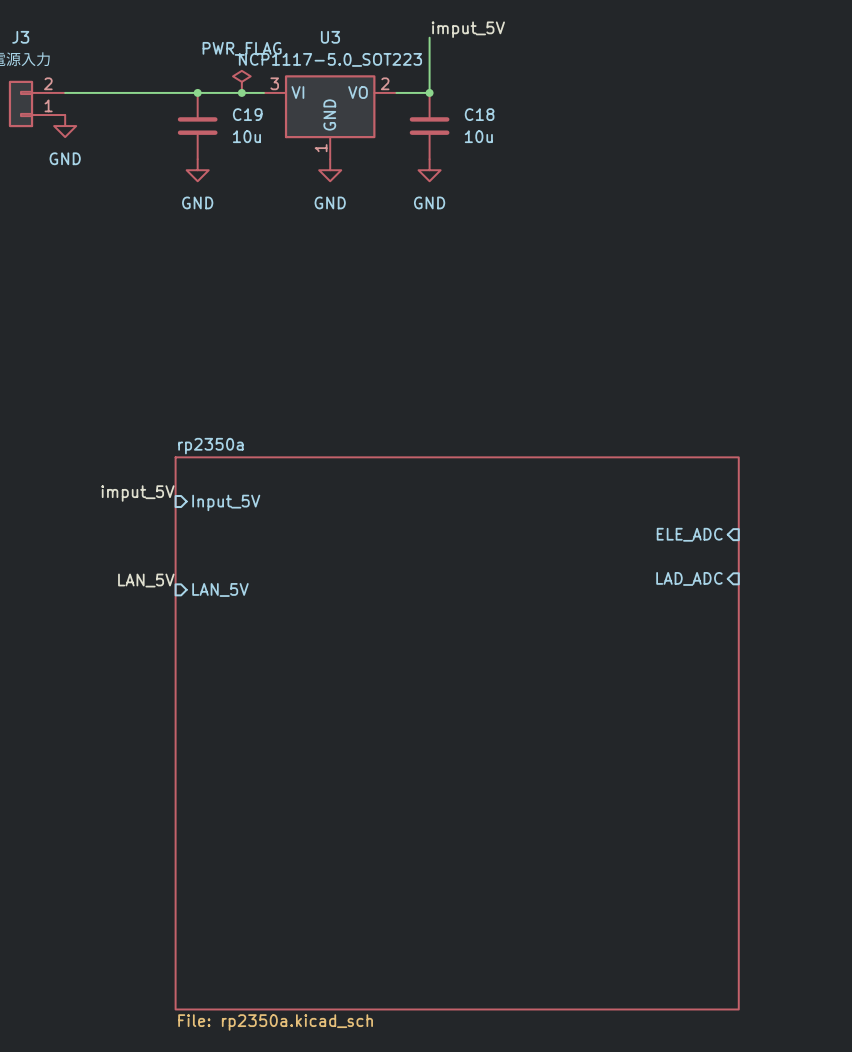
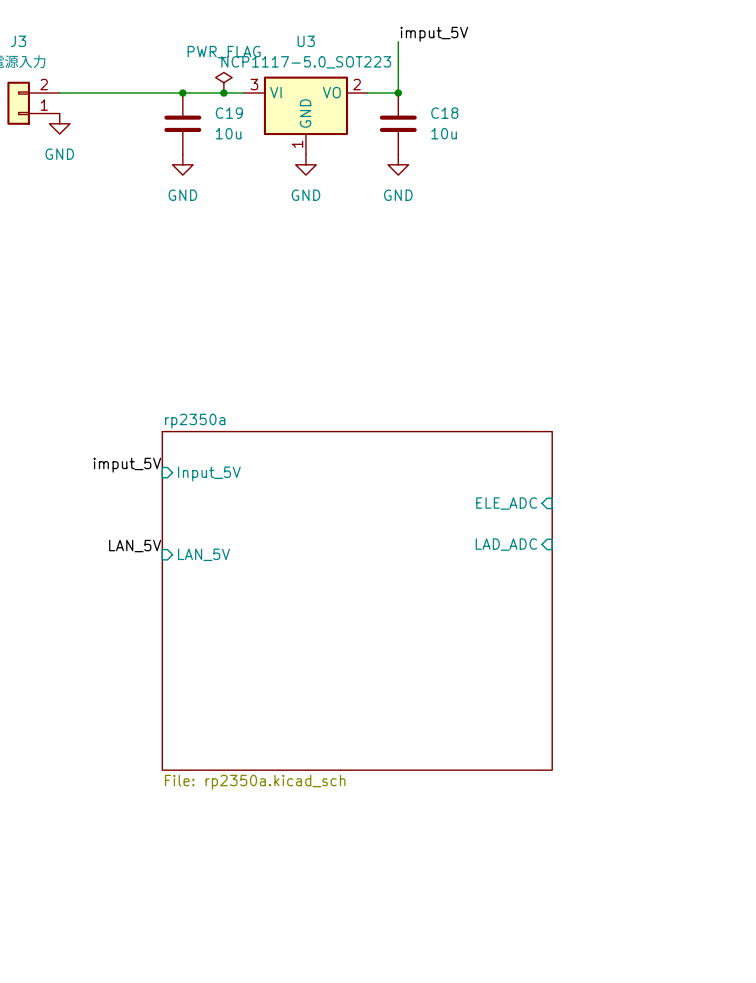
sheet rp2350a shape: [174, 456, 740, 1011] -> [161, 430, 553, 771]
sheet pin position: ELE_ADC (689, 534) -> ELE_ADC (506, 503)
sheet pin position: LAD_ADC (689, 578) -> LAD_ADC (506, 544)
sheet rp2350a value position: File: rp2350a.kicad_sch (275, 1022) -> File: rp2350a.kicad_sch (255, 782)

